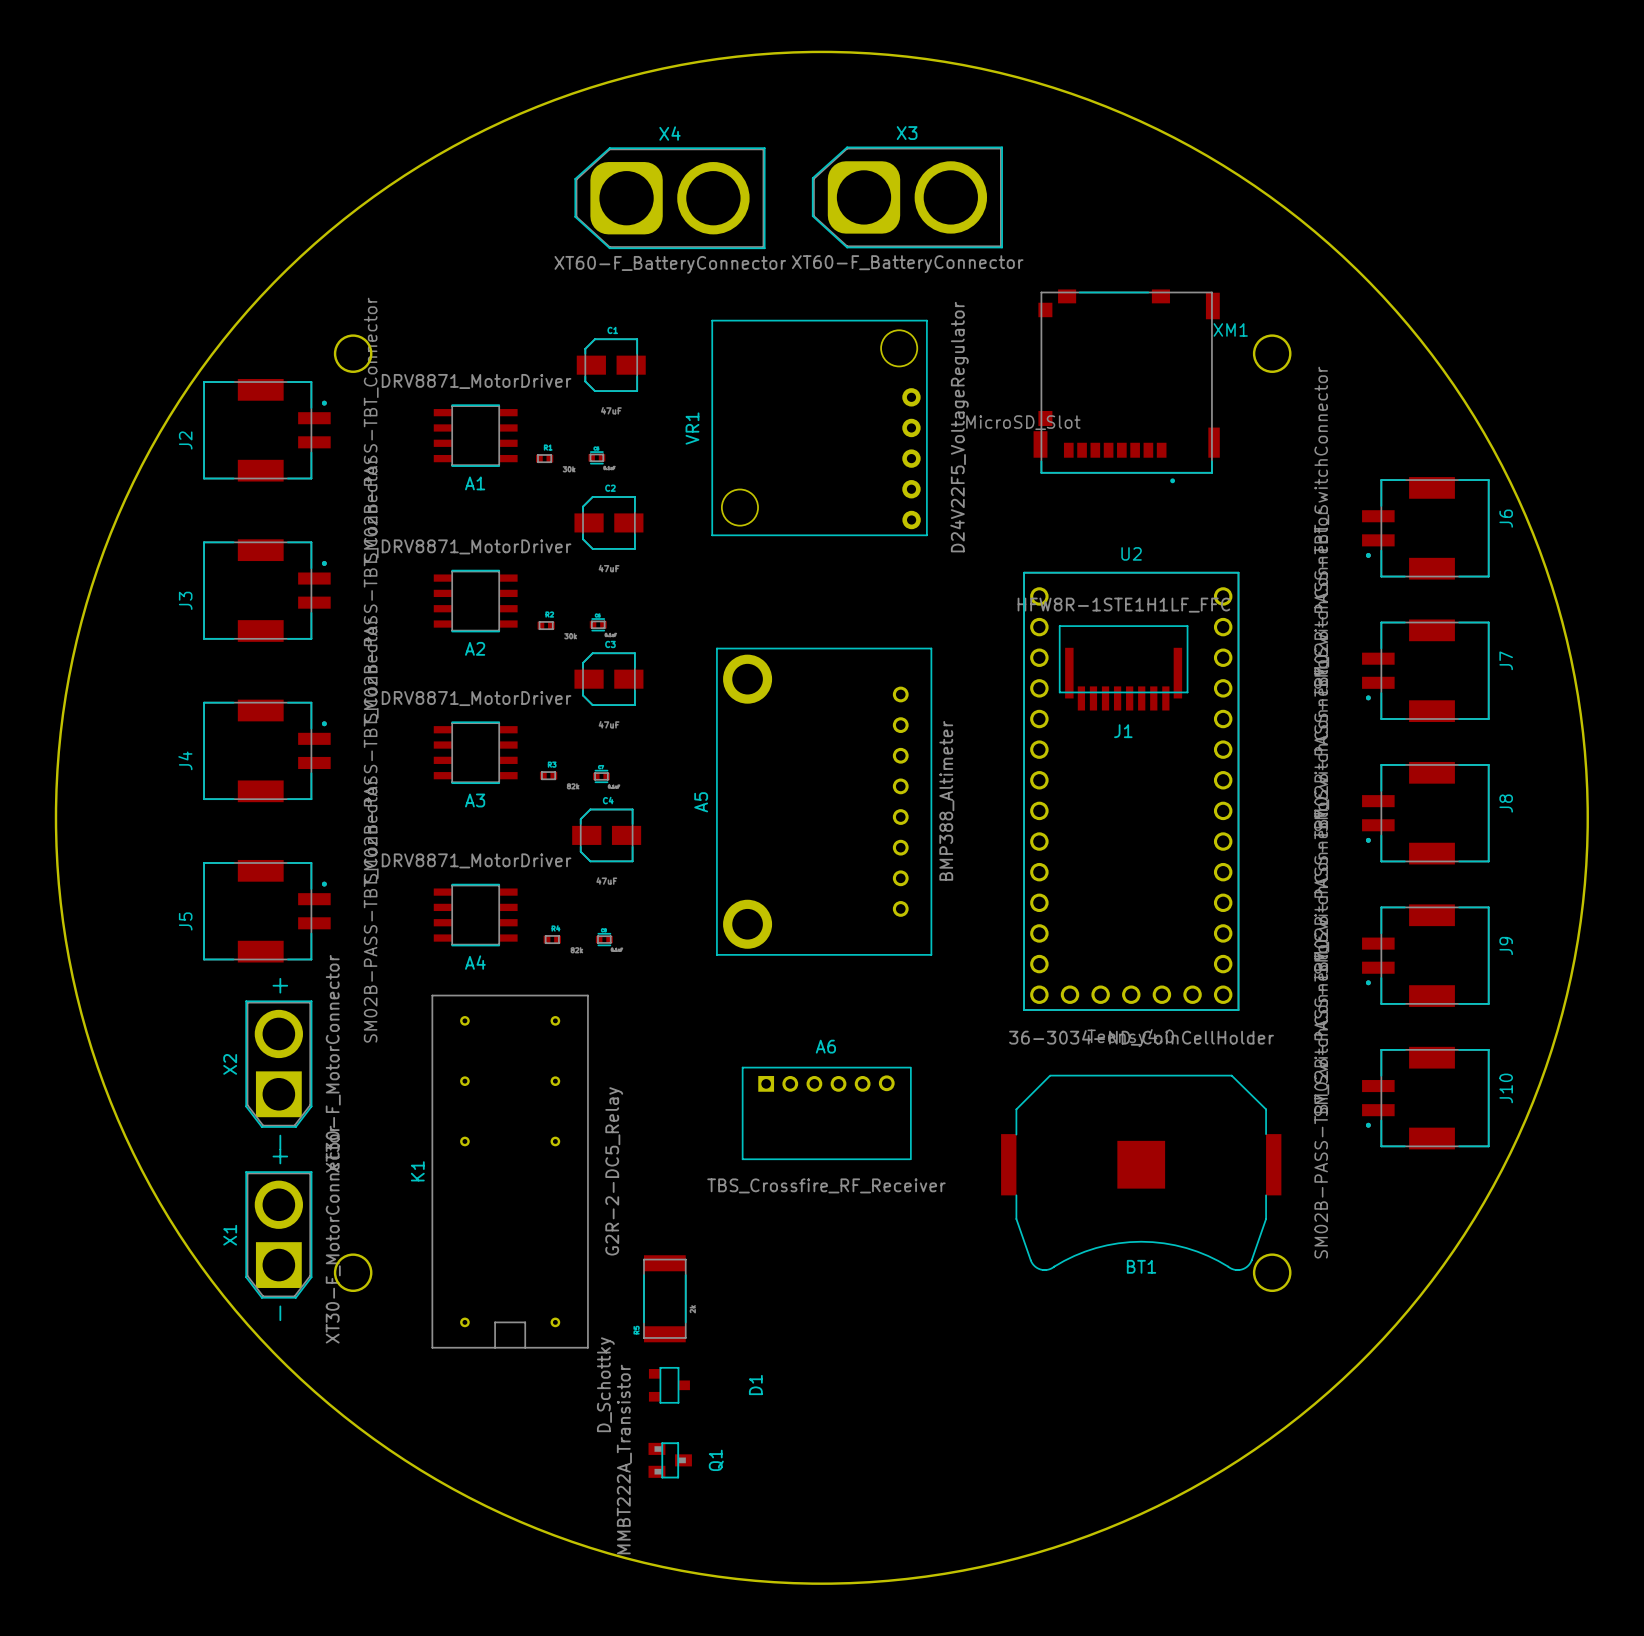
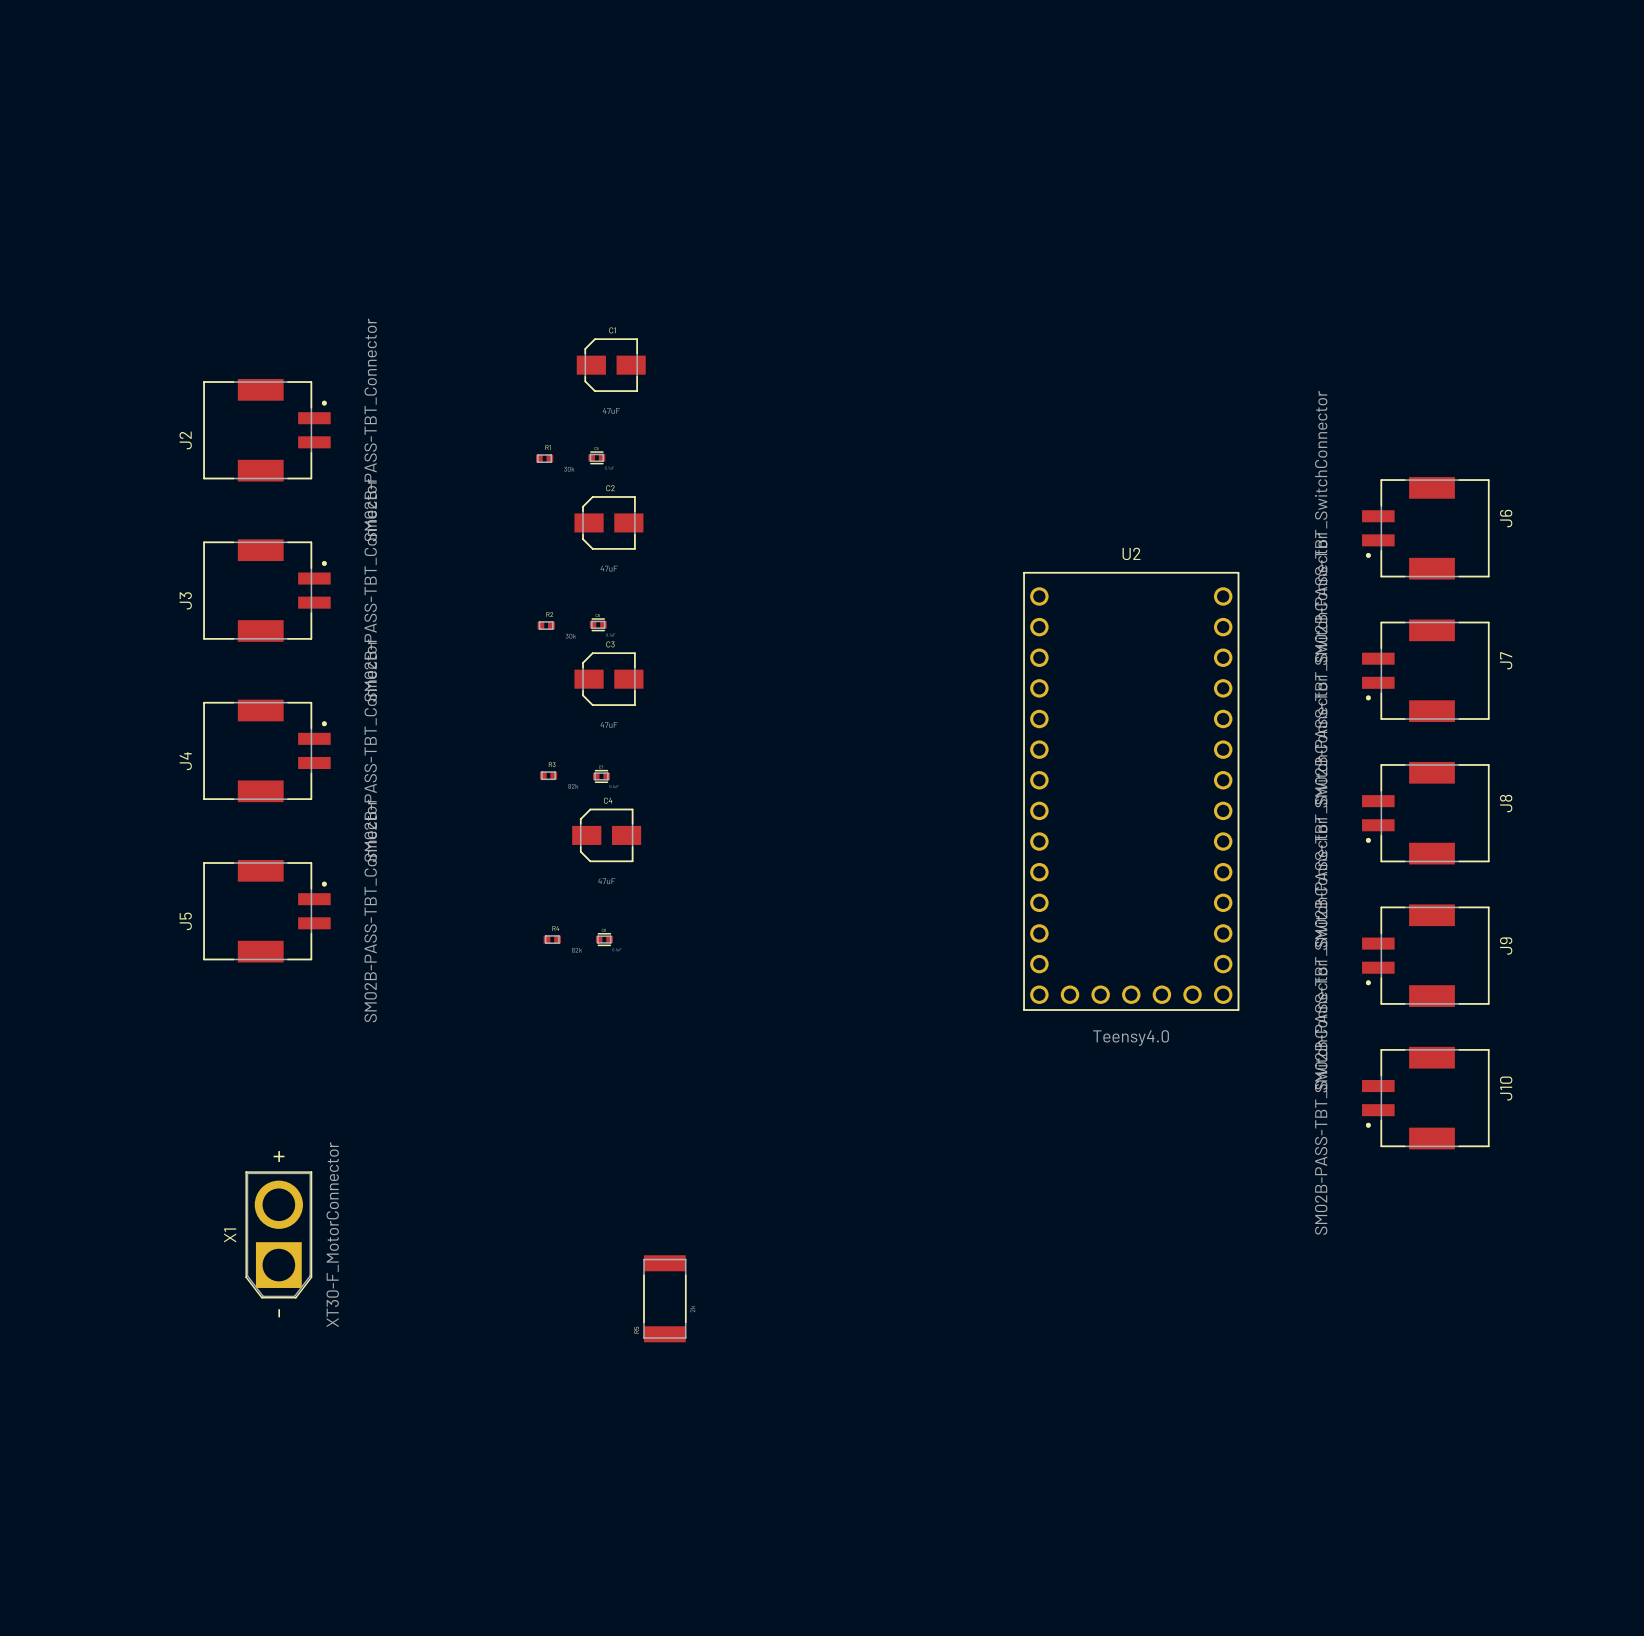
round board edge: [54, 50, 1589, 1585] -> none
X3: XT60-F_BatteryConnector (907, 197) -> none
X4: XT60-F_BatteryConnector (669, 198) -> none
round board edge: [333, 334, 373, 373] -> none
round board edge: [1252, 334, 1292, 373] -> none
XM1: MicroSD_Slot (1126, 386) -> none
VR1: D24V22F5_VoltageRegulator (819, 427) -> none
A1: DRV8871_MotorDriver (475, 435) -> none
A2: DRV8871_MotorDriver (475, 601) -> none
J1: HFW8R-1STE1H1LF_FFC (1123, 667) -> none
A3: DRV8871_MotorDriver (475, 752) -> none
A5: BMP388_Altimeter (824, 801) -> none
A4: DRV8871_MotorDriver (475, 915) -> none
X2: XT30-F_MotorConnector (278, 1064) -> none
A6: TBS_Crossfire_RF_Receiver (826, 1113) -> none
K1: G2R-2-DC5_Relay (510, 1171) -> none
BT1: 36-3034-ND_CoinCellHolder (1141, 1172) -> none
round board edge: [333, 1253, 373, 1293] -> none
round board edge: [1252, 1253, 1292, 1293] -> none
D1: D_Schottky (669, 1385) -> none
Q1: MMBT222A_Transistor (670, 1460) -> none

